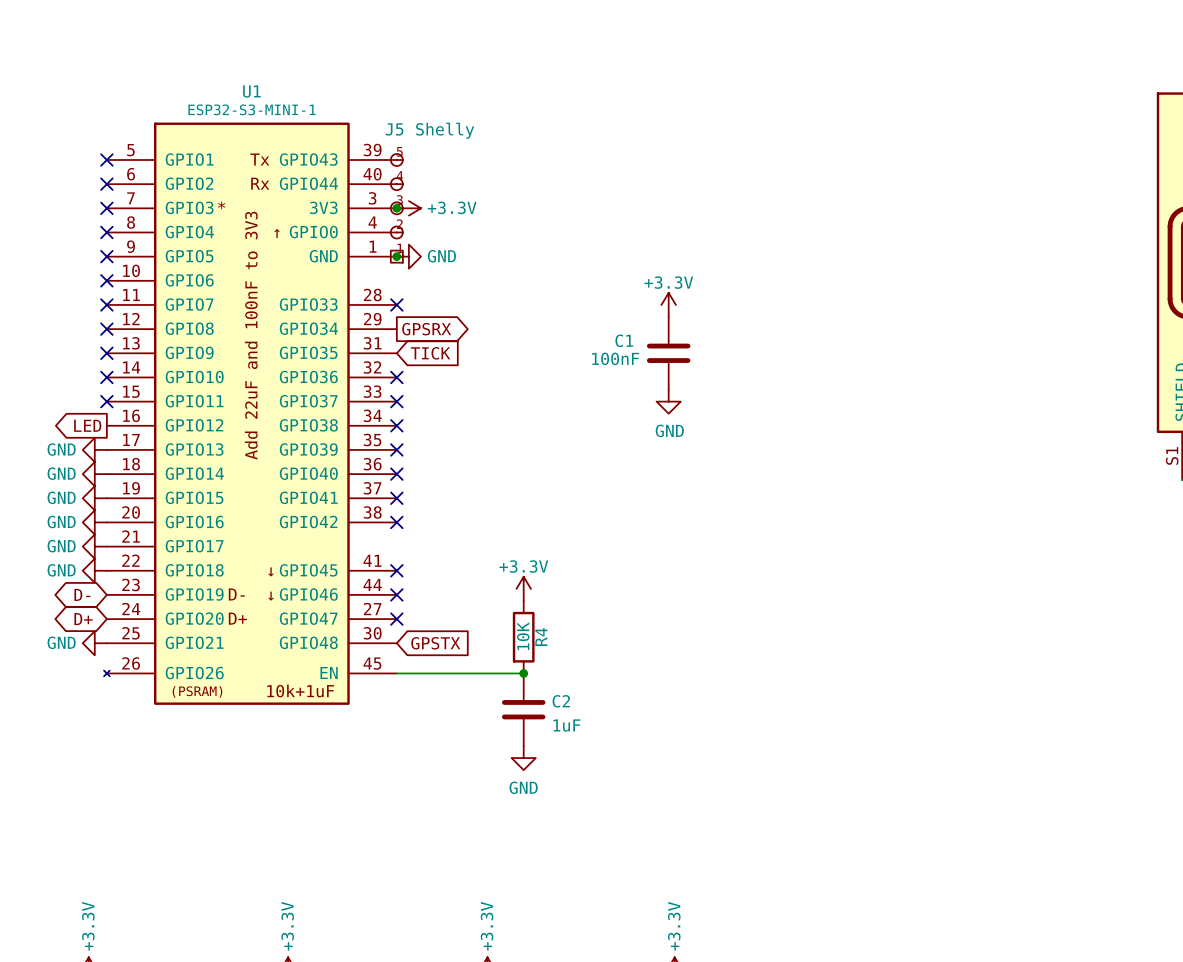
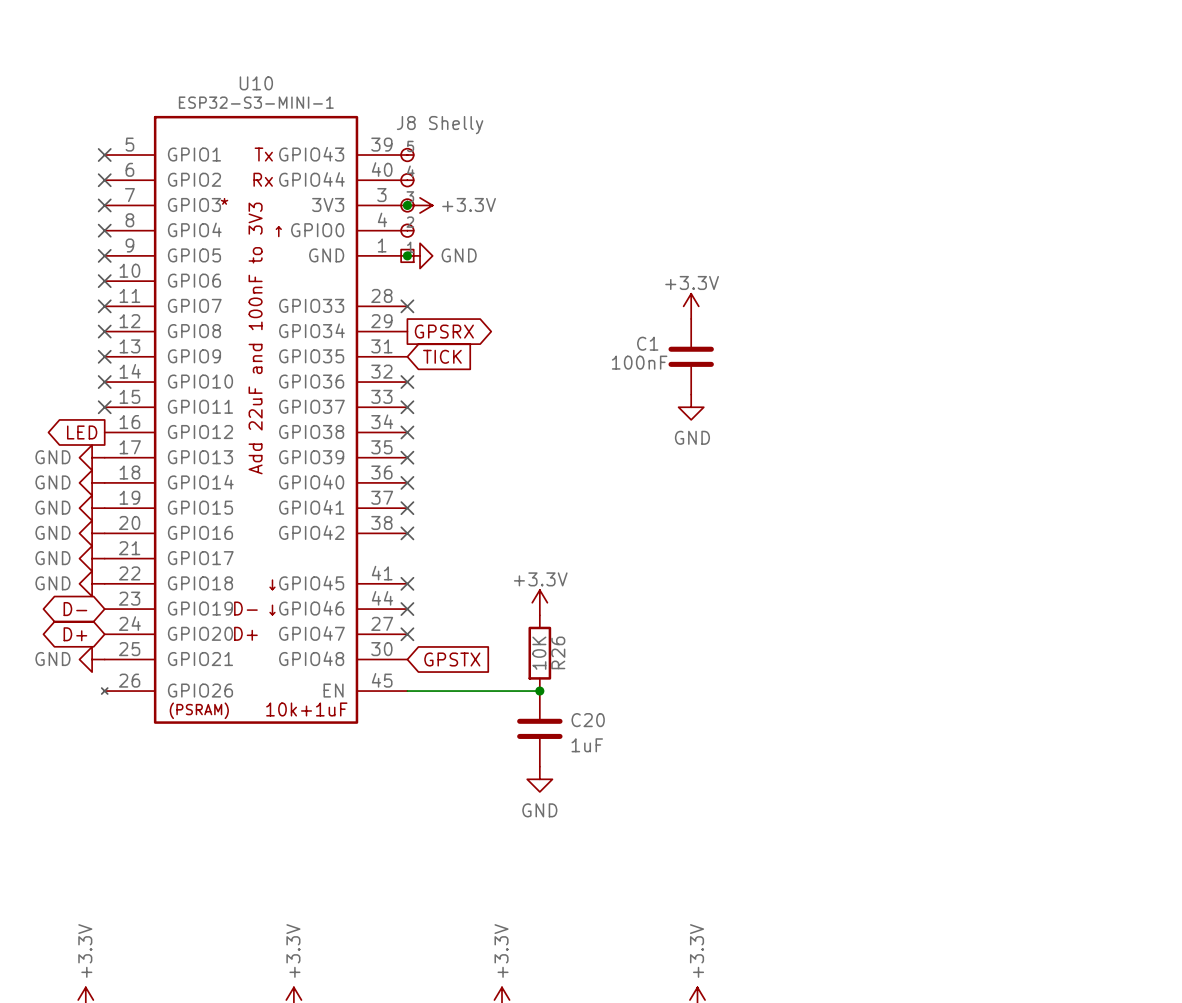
U1 name: U1 (251, 91) -> U10 (256, 83)
J5 name: J5 (394, 129) -> J8 (406, 123)
R4 name: R4 (541, 637) -> R26 (558, 652)
C2 name: C2 (561, 701) -> C20 (588, 720)

